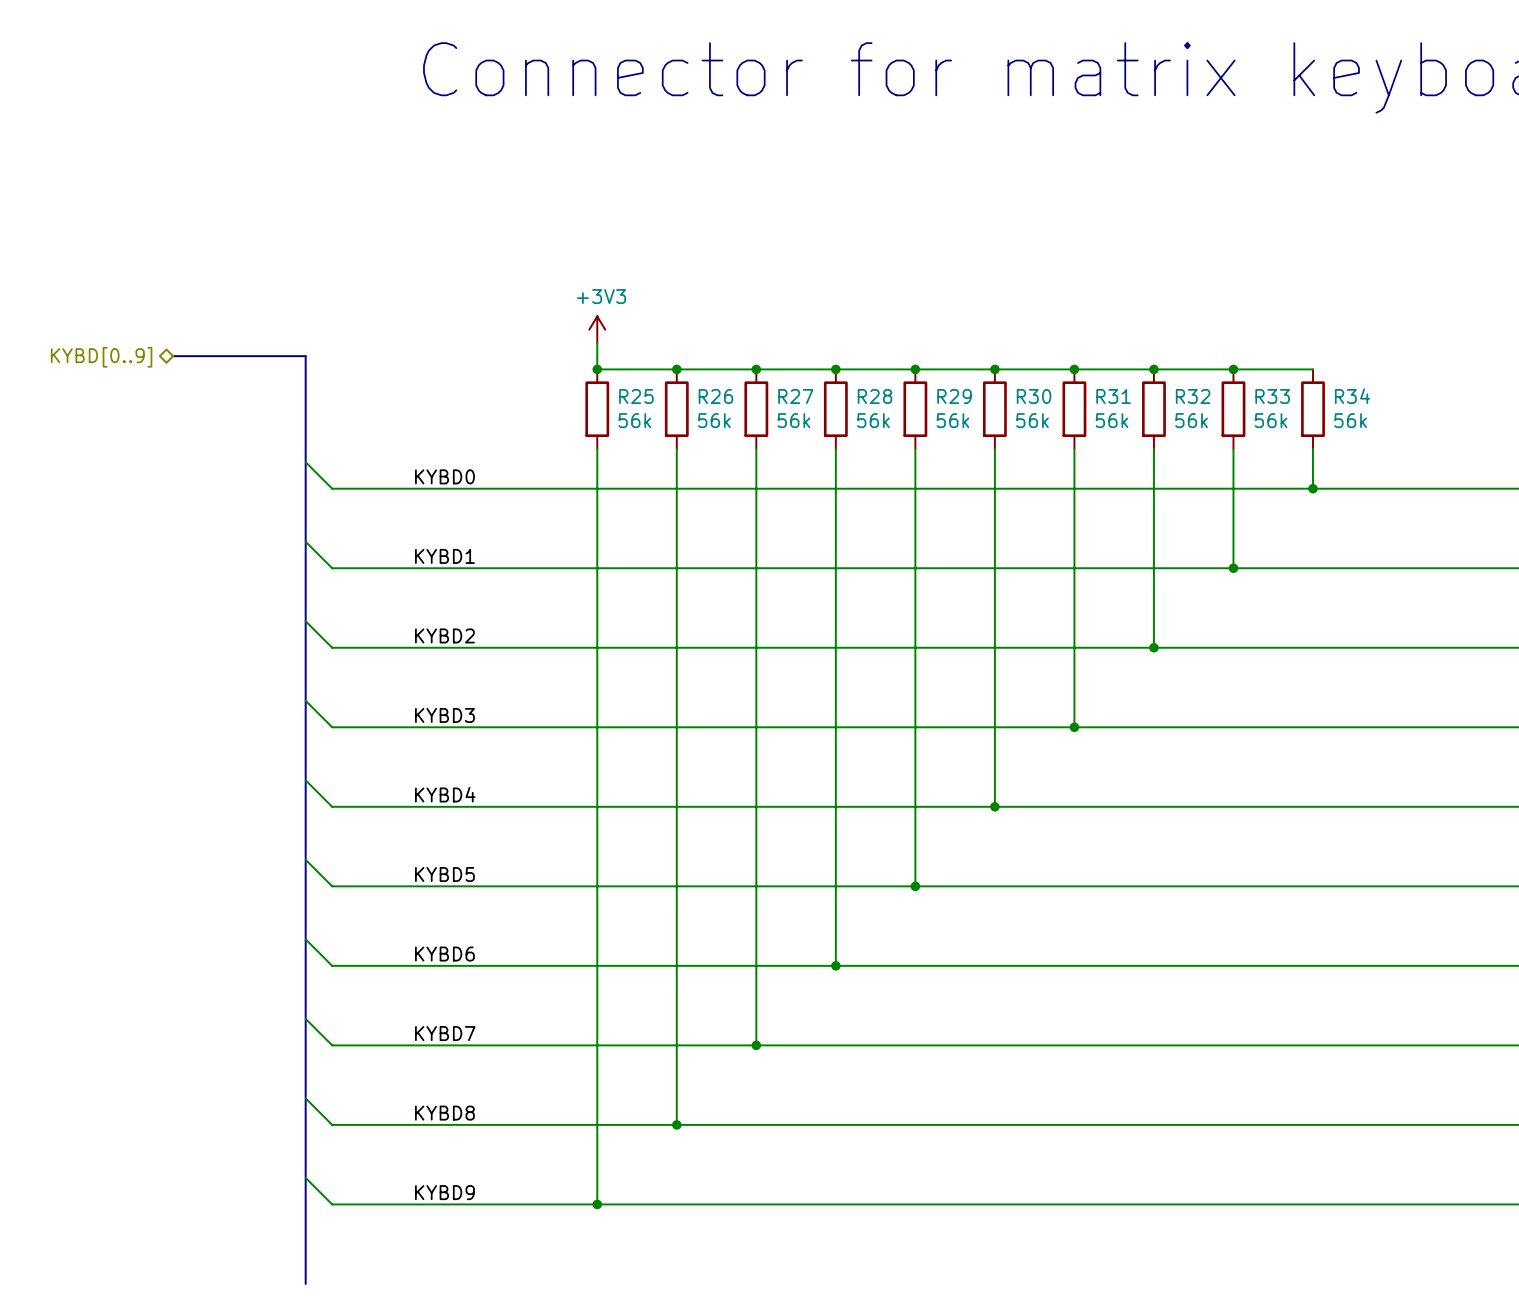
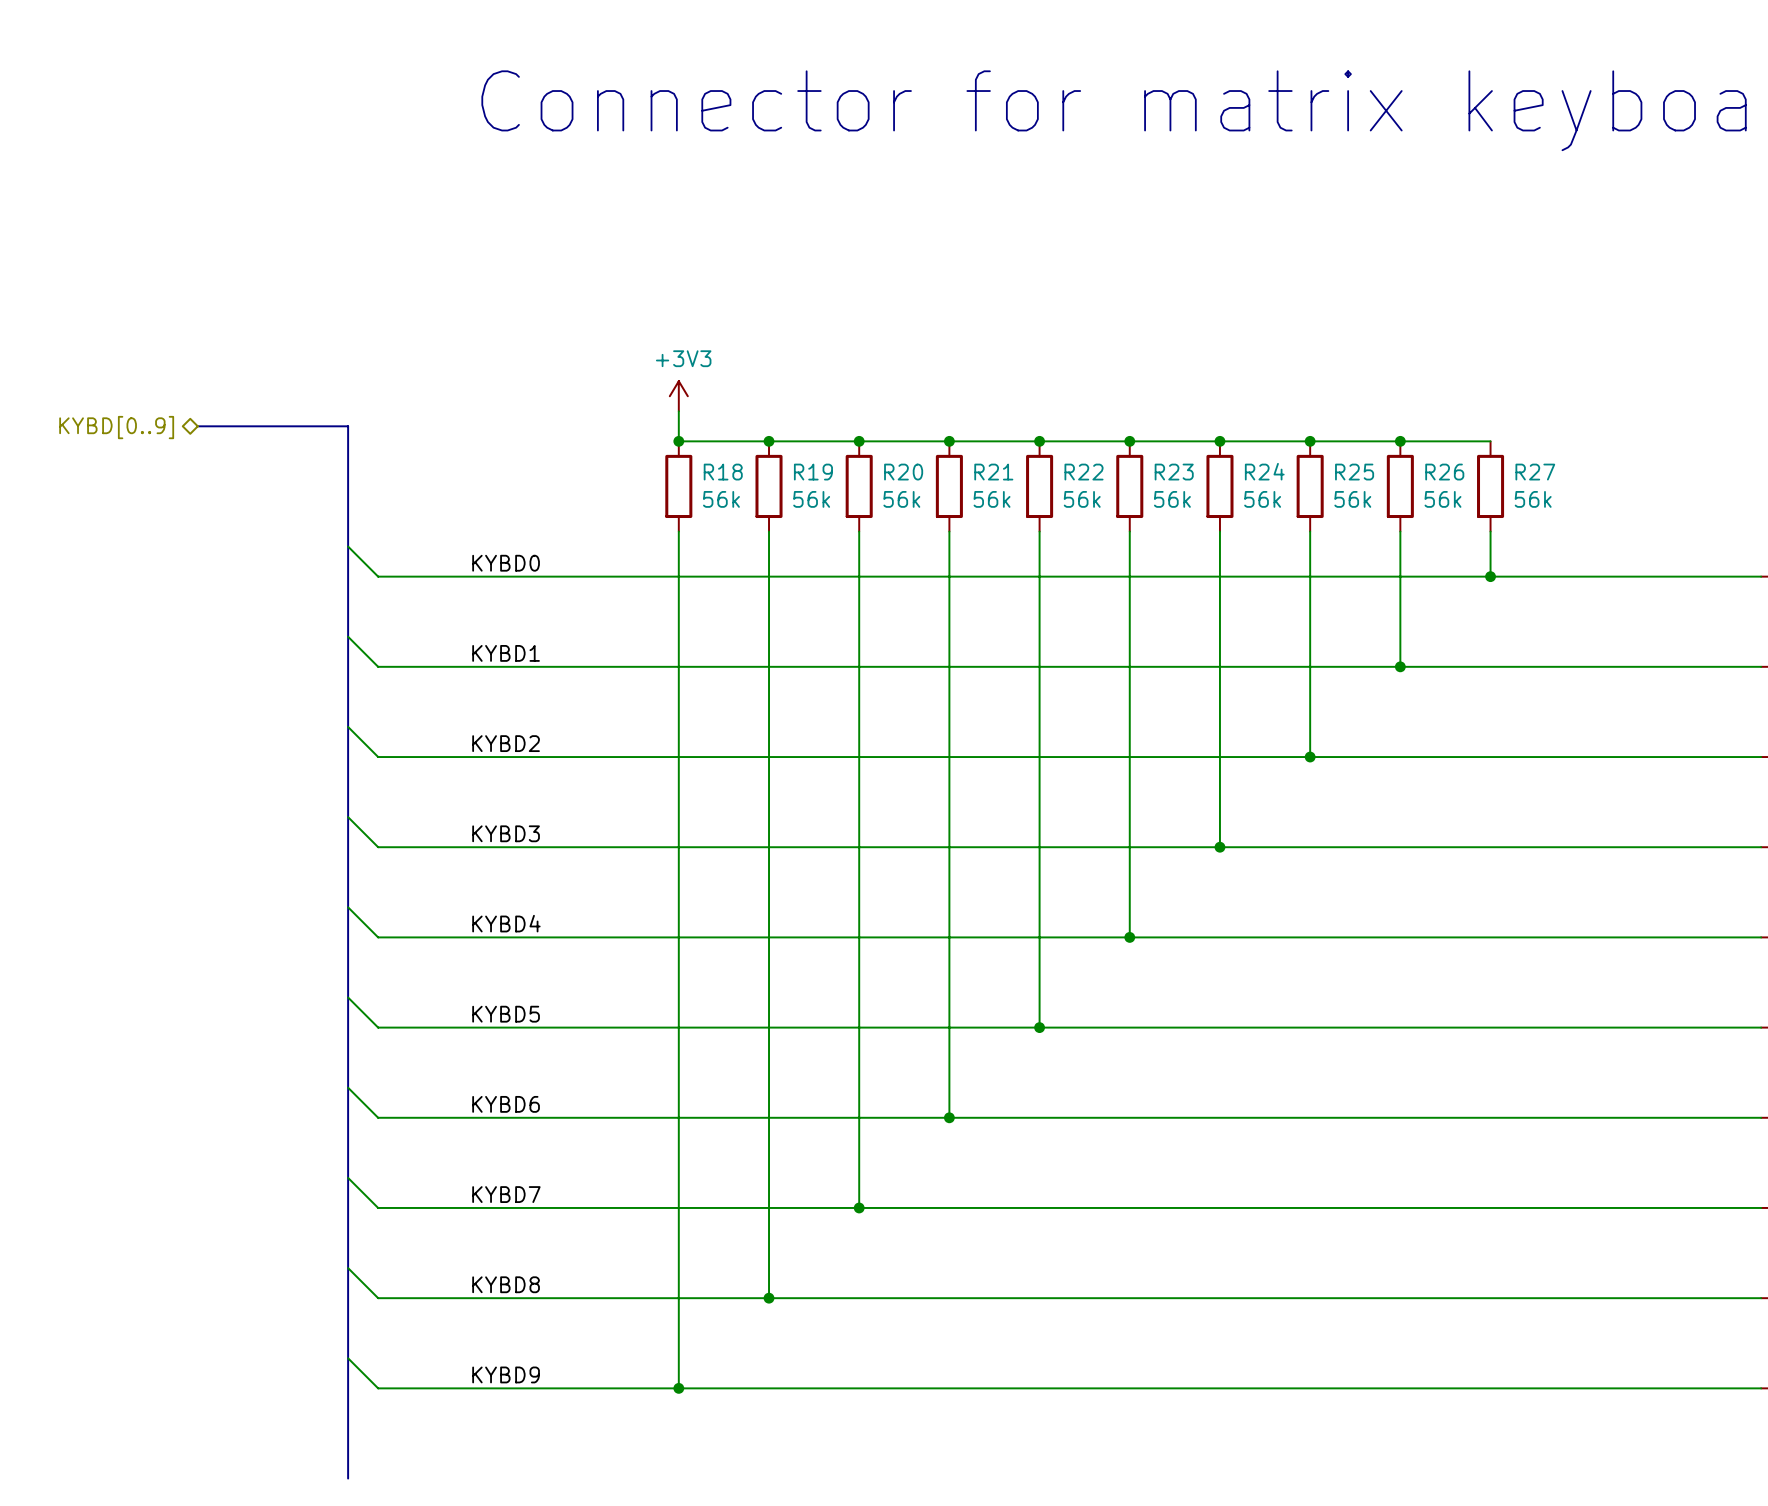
R25 name: R25 (636, 396) -> R18 (723, 472)
R26 name: R26 (715, 396) -> R19 (813, 472)
R27 name: R27 (795, 396) -> R20 (903, 472)
R28 name: R28 (875, 396) -> R21 (993, 472)
R29 name: R29 (954, 396) -> R22 (1084, 472)
R30 name: R30 (1034, 396) -> R23 (1174, 472)
R31 name: R31 (1113, 396) -> R24 (1264, 471)
R32 name: R32 (1193, 396) -> R25 (1354, 472)
R33 name: R33 (1272, 396) -> R26 (1444, 472)
R34 name: R34 (1352, 396) -> R27 (1535, 472)

